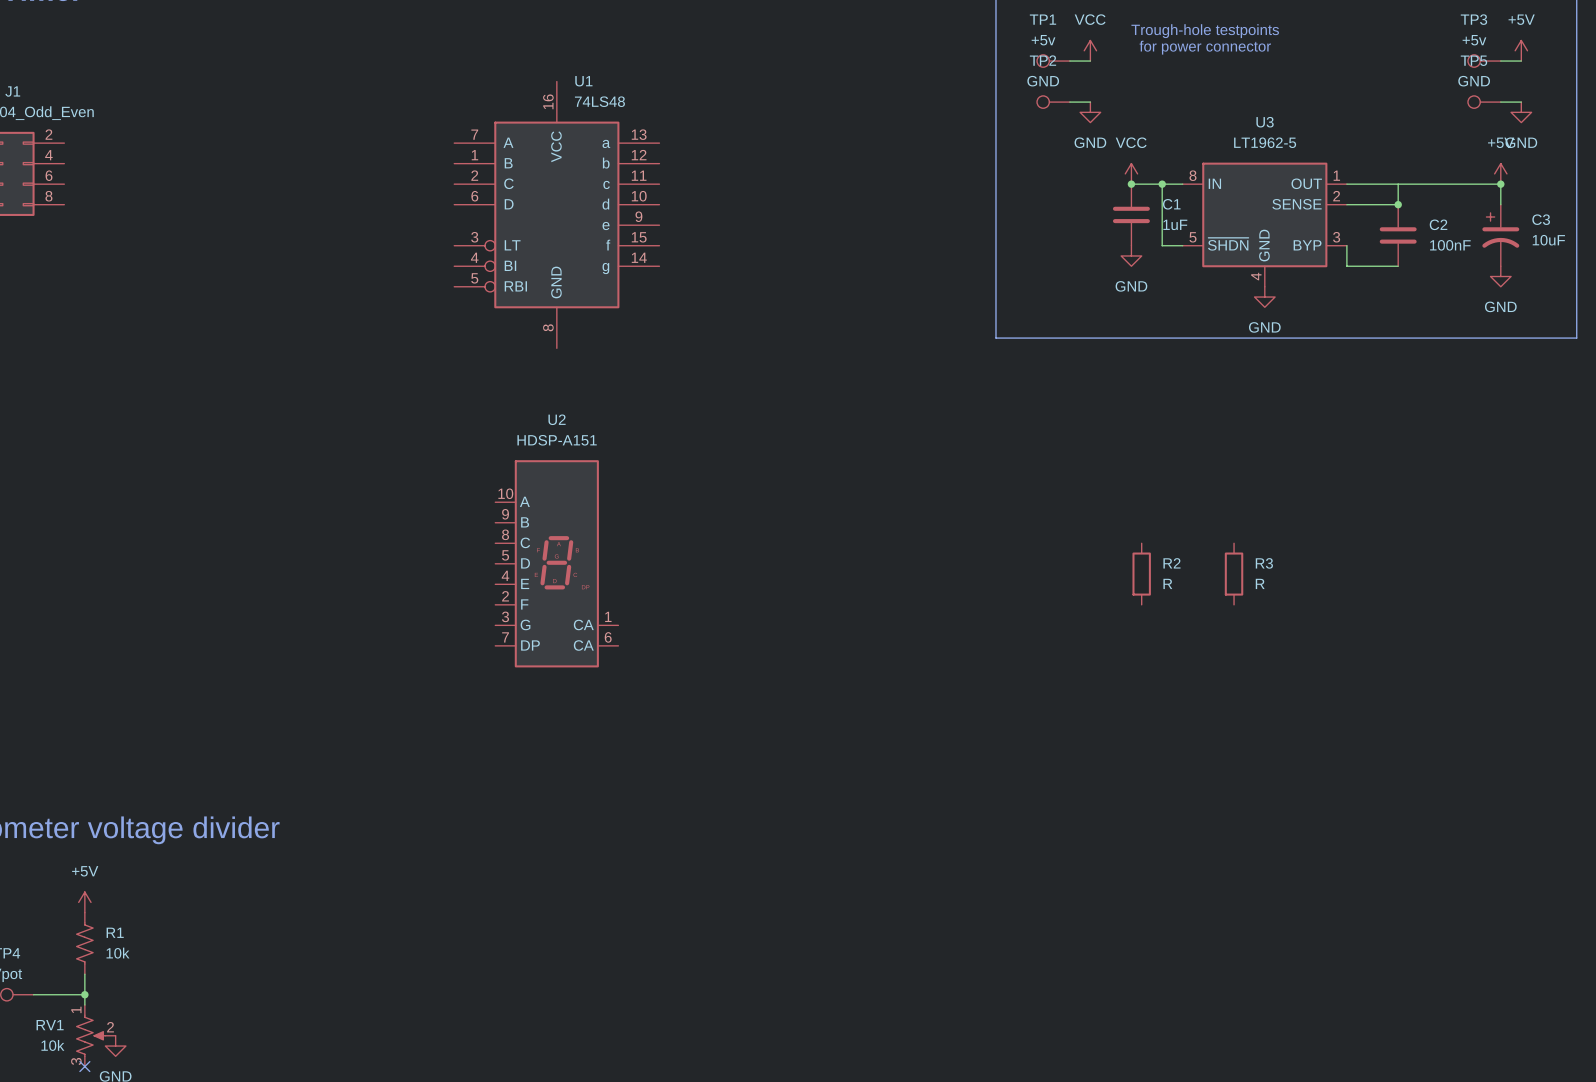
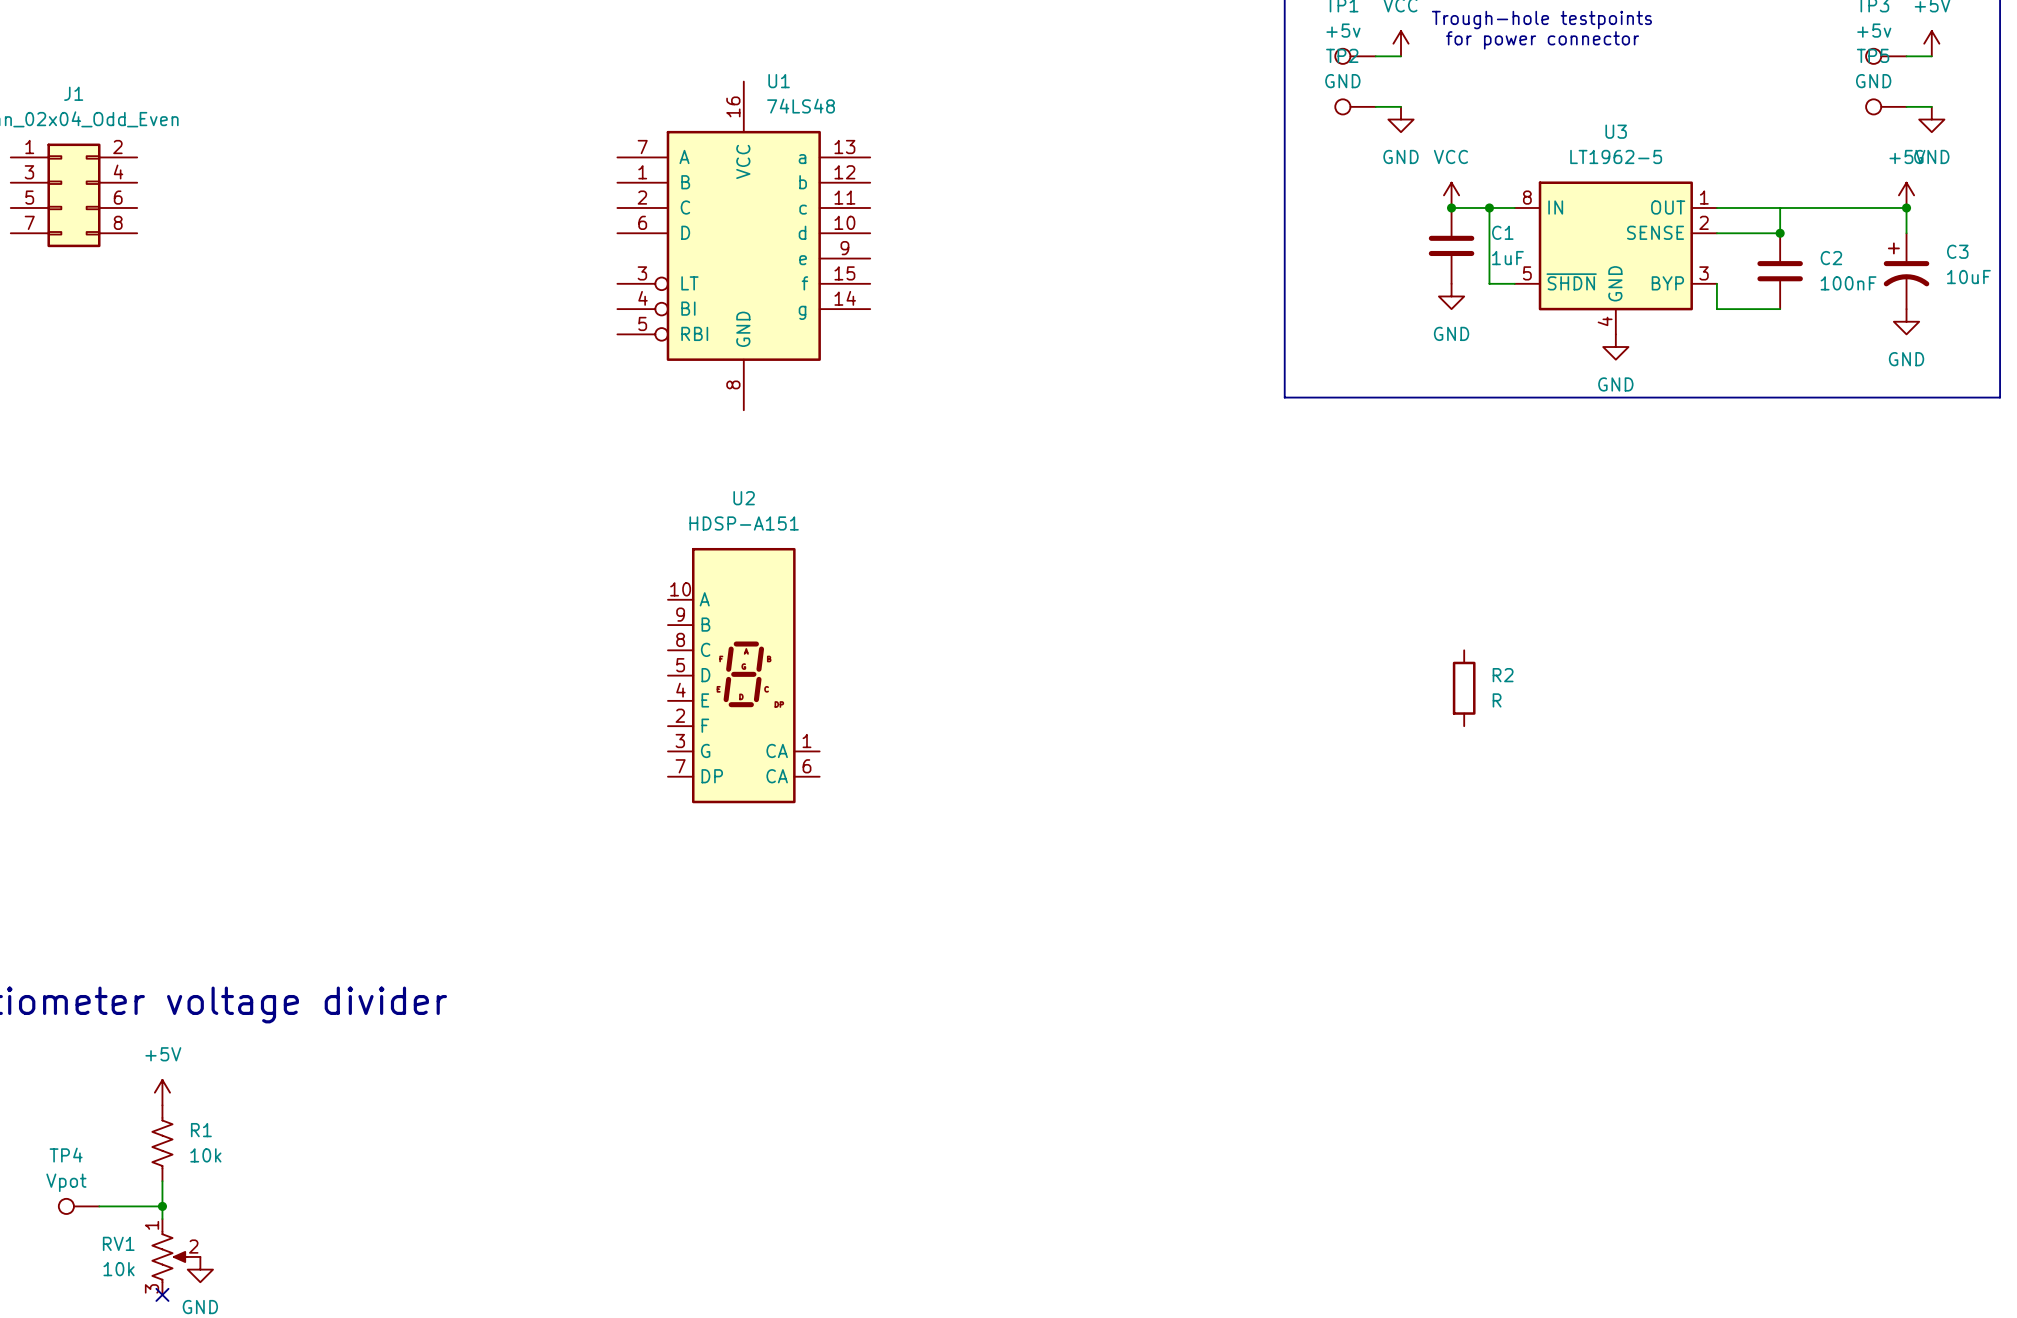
R3: R (1234, 574) -> none

